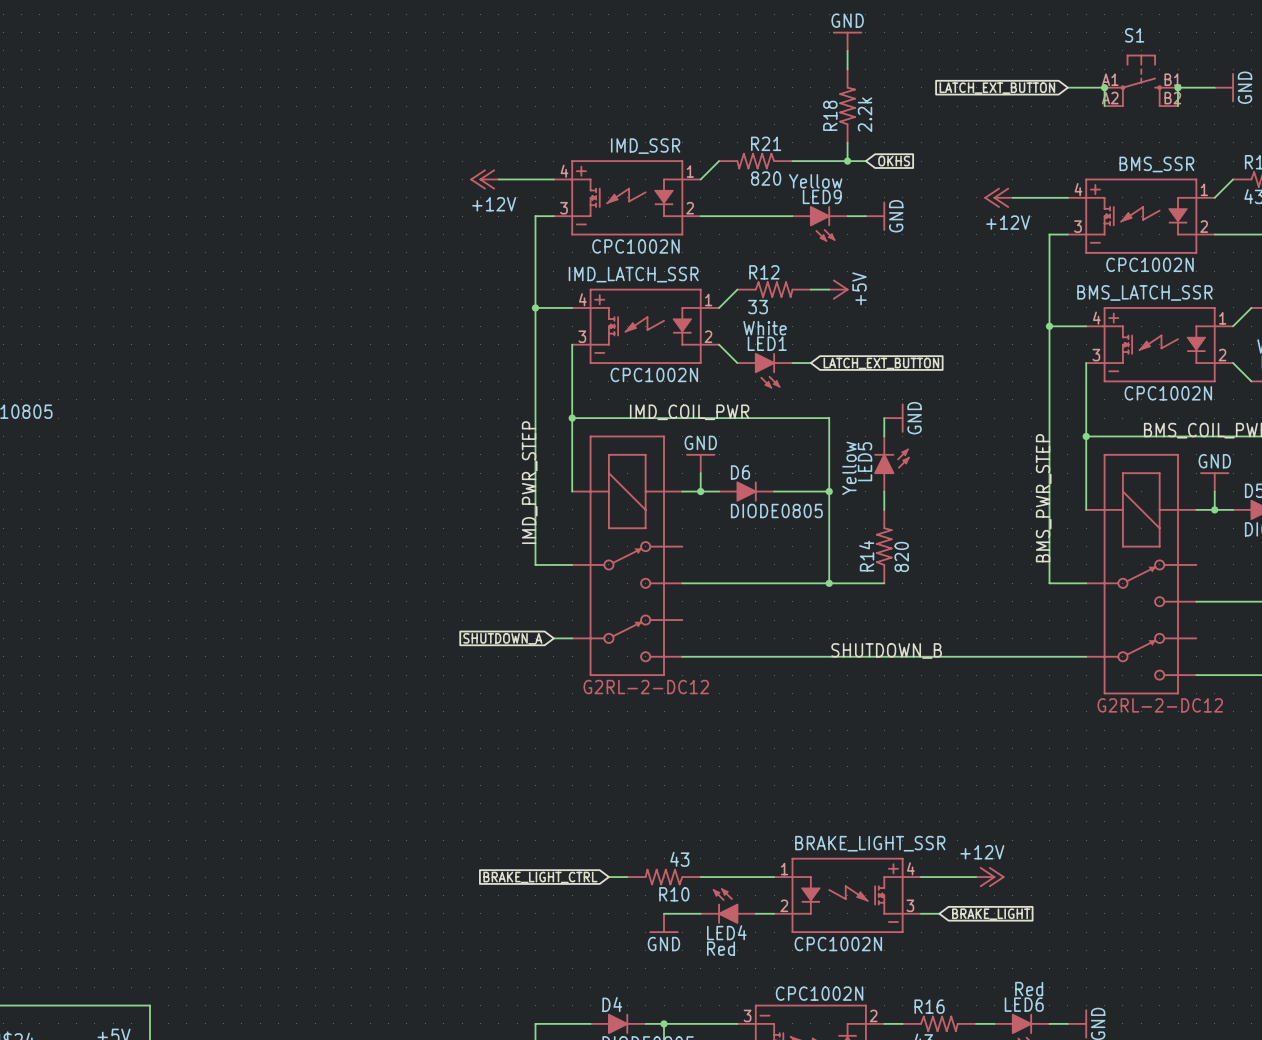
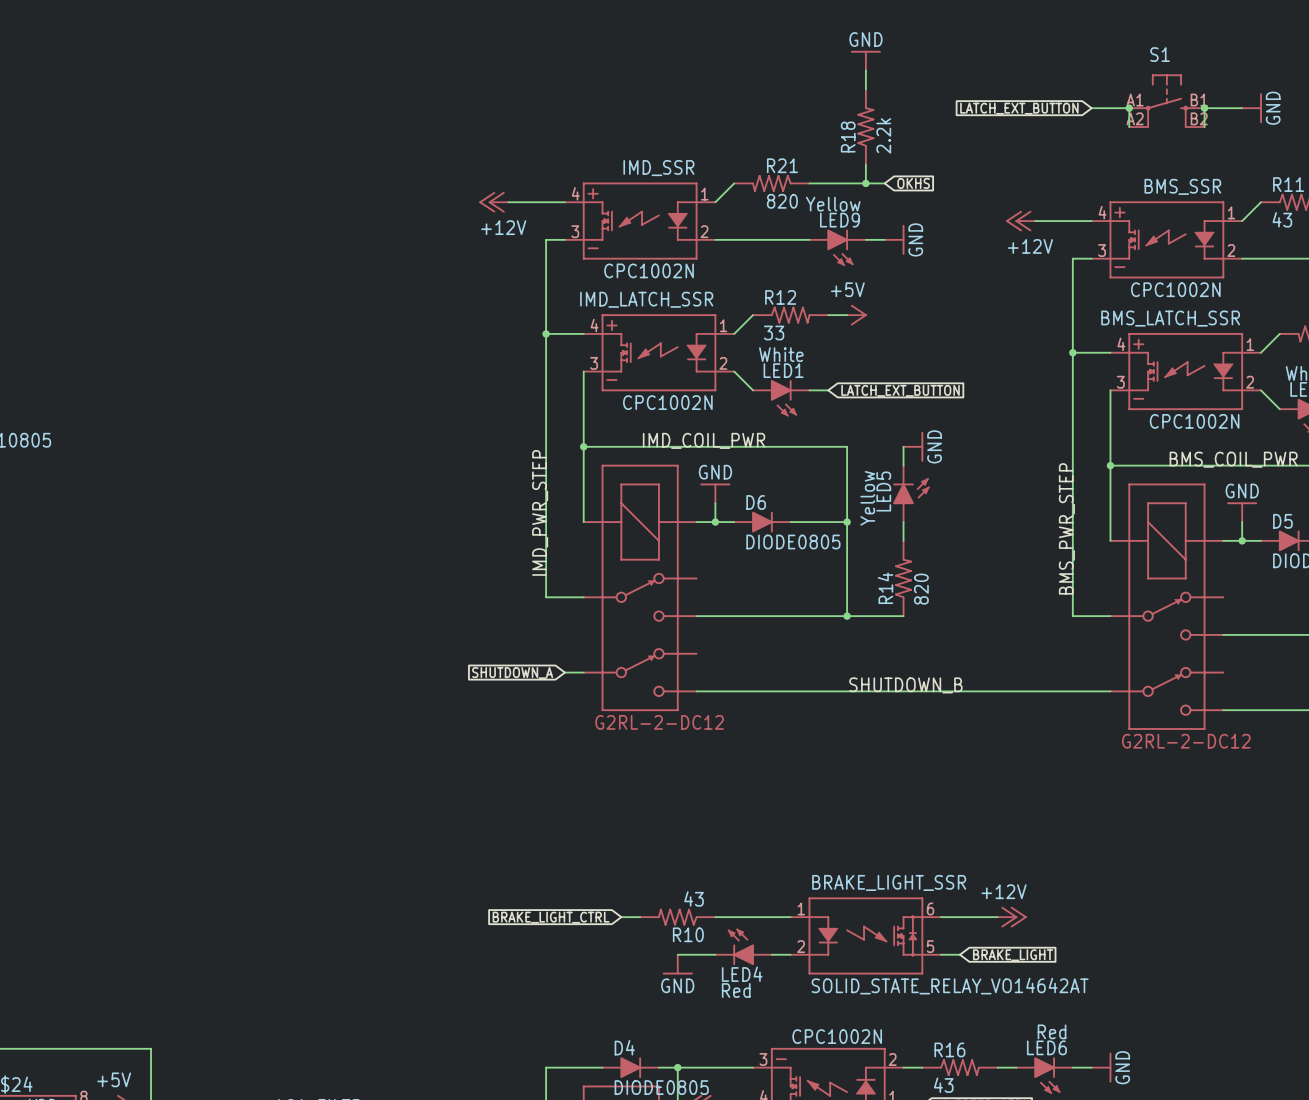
power symbol text rotation: 0° (859, 288) -> 90° clockwise (847, 289)
BRAKE_LIGHT_SSR symbol: [774, 857, 922, 934] -> [790, 897, 942, 975]
BRAKE_LIGHT_SSR value: CPC1002N (838, 944) -> SOLID_STATE_RELAY_VO14642AT (950, 986)

